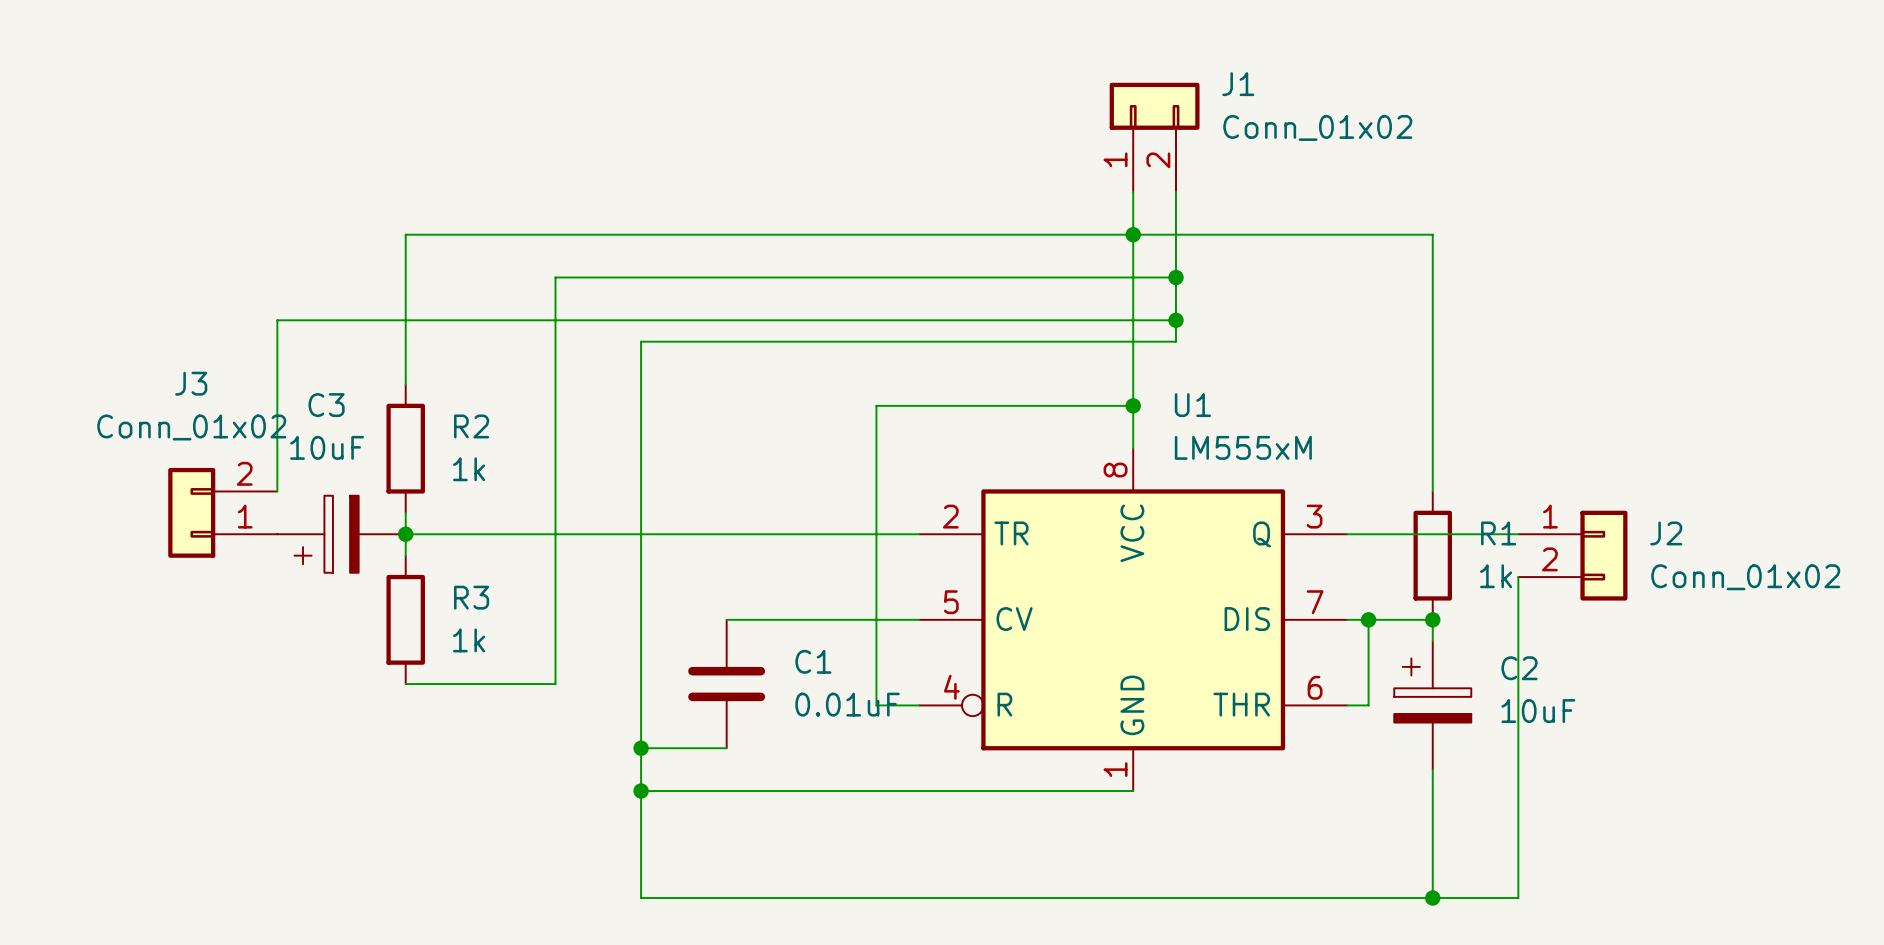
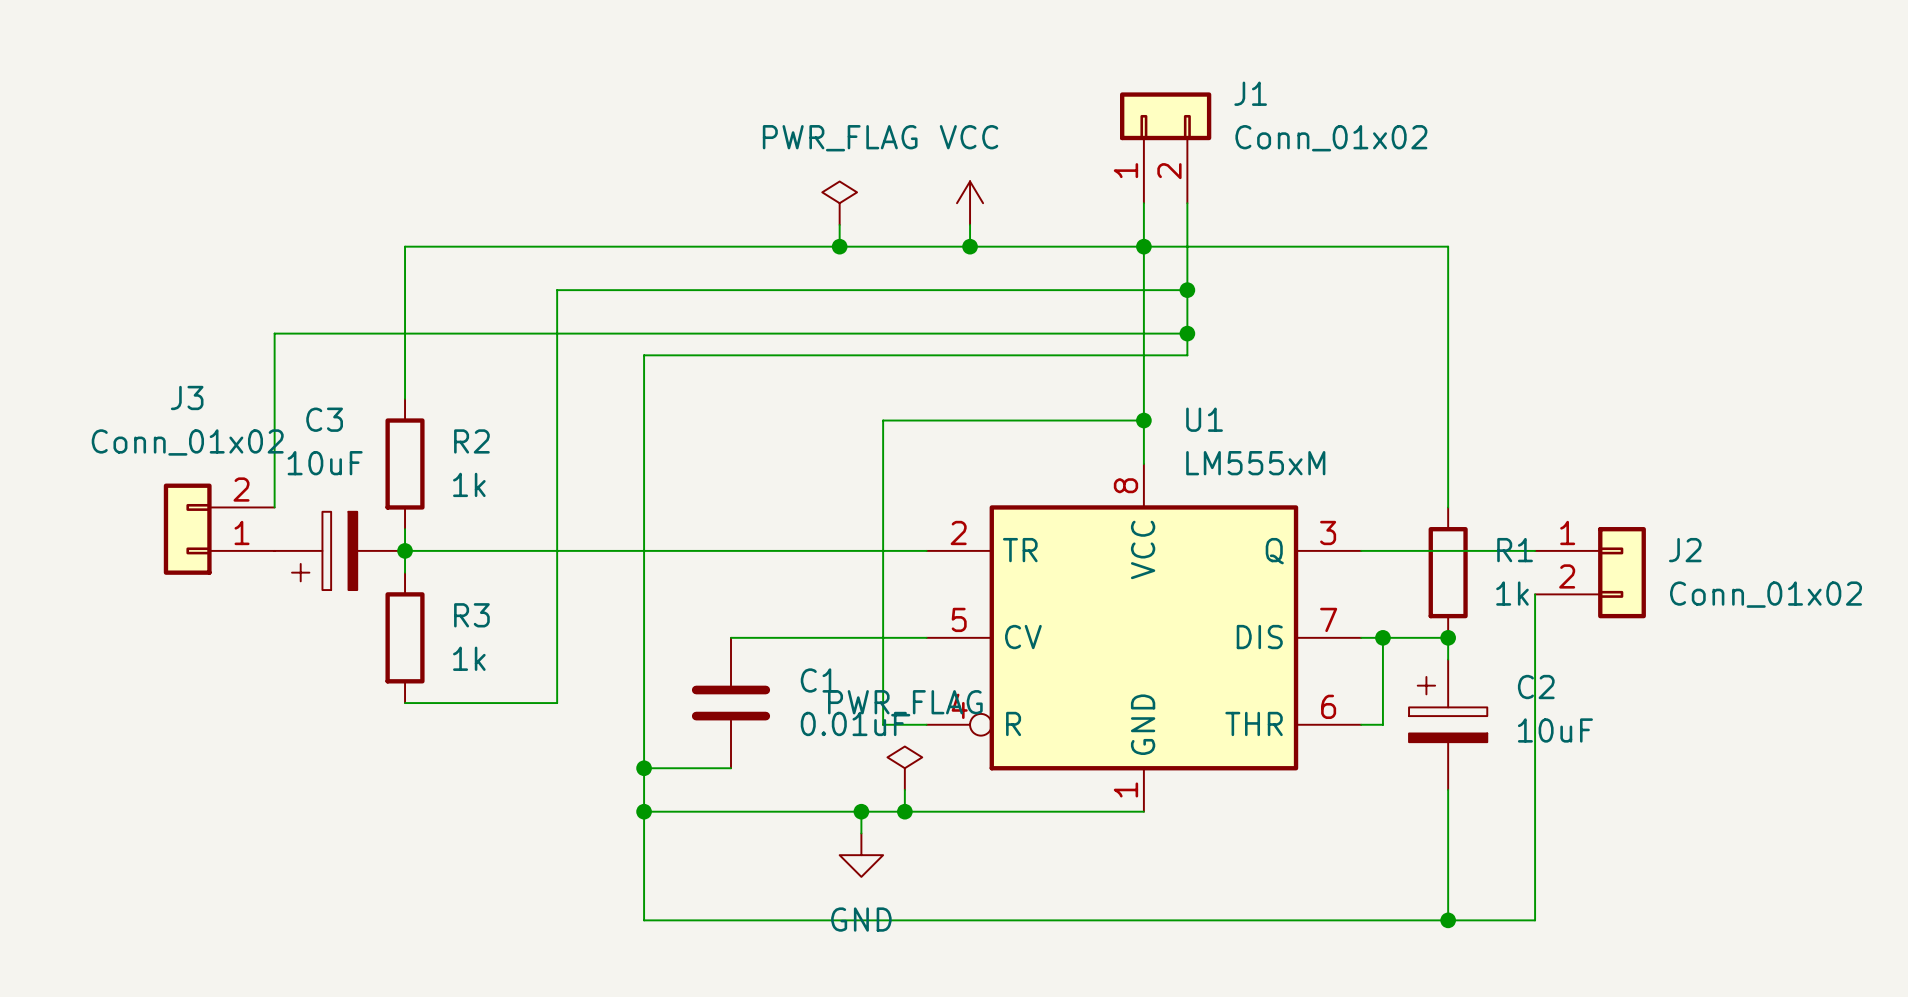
power symbol: none -> PWR_FLAG (839, 203)
power symbol: none -> VCC (970, 203)
wire: none -> (839, 224) (839, 246)
wire: none -> (970, 224) (970, 246)
junction: none -> (839, 246)
junction: none -> (970, 246)
power symbol: none -> PWR_FLAG (904, 768)
wire: none -> (904, 789) (904, 811)
wire: none -> (861, 811) (861, 833)
junction: none -> (861, 811)
junction: none -> (904, 811)
power symbol: none -> GND (861, 855)

